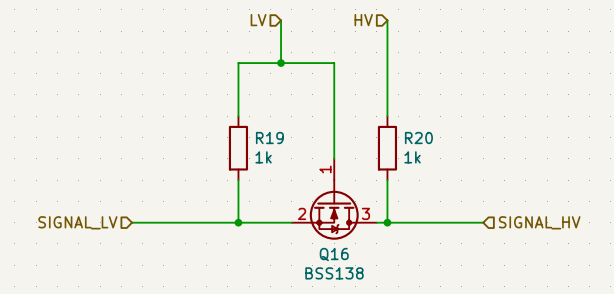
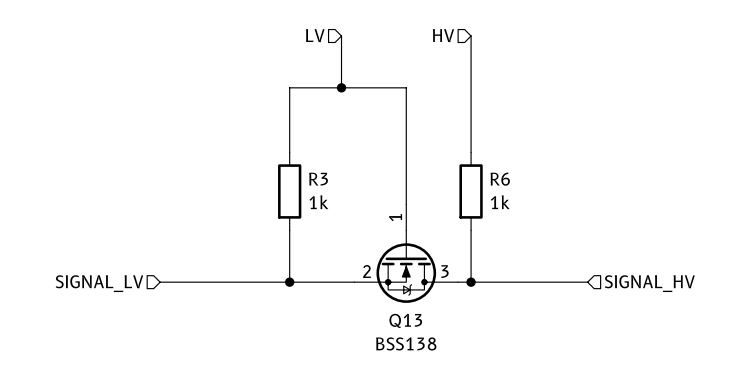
R19 name: R19 (269, 138) -> R3 (318, 179)
R20 name: R20 (418, 138) -> R6 (500, 179)
Q16 name: Q16 (334, 254) -> Q13 (405, 320)

